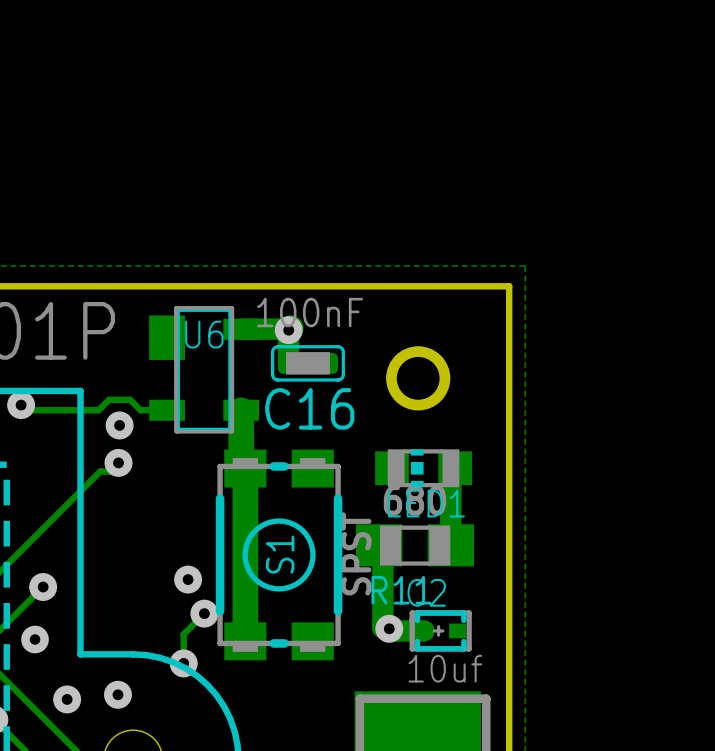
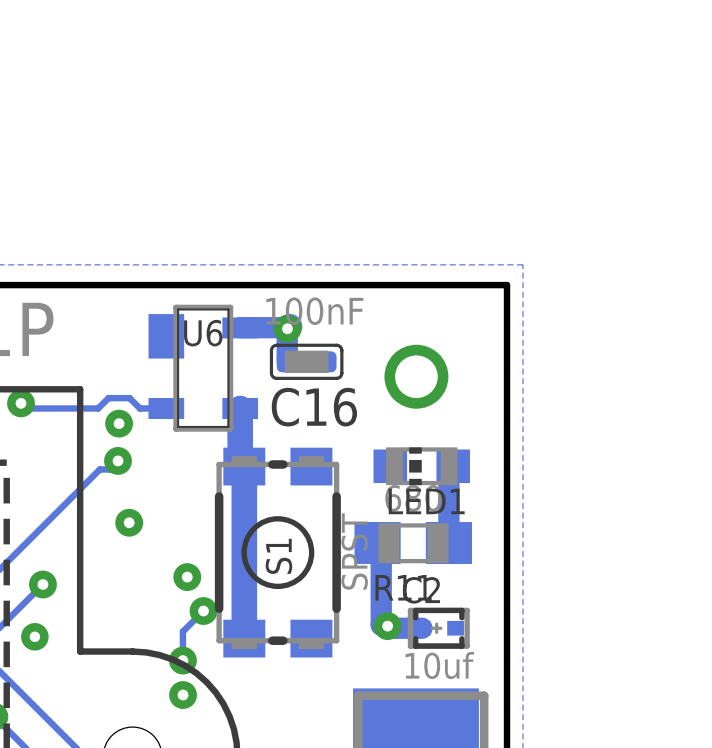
via: none -> (129, 522)
via: (117, 694) -> none
via: none -> (183, 695)
via: (67, 699) -> none

